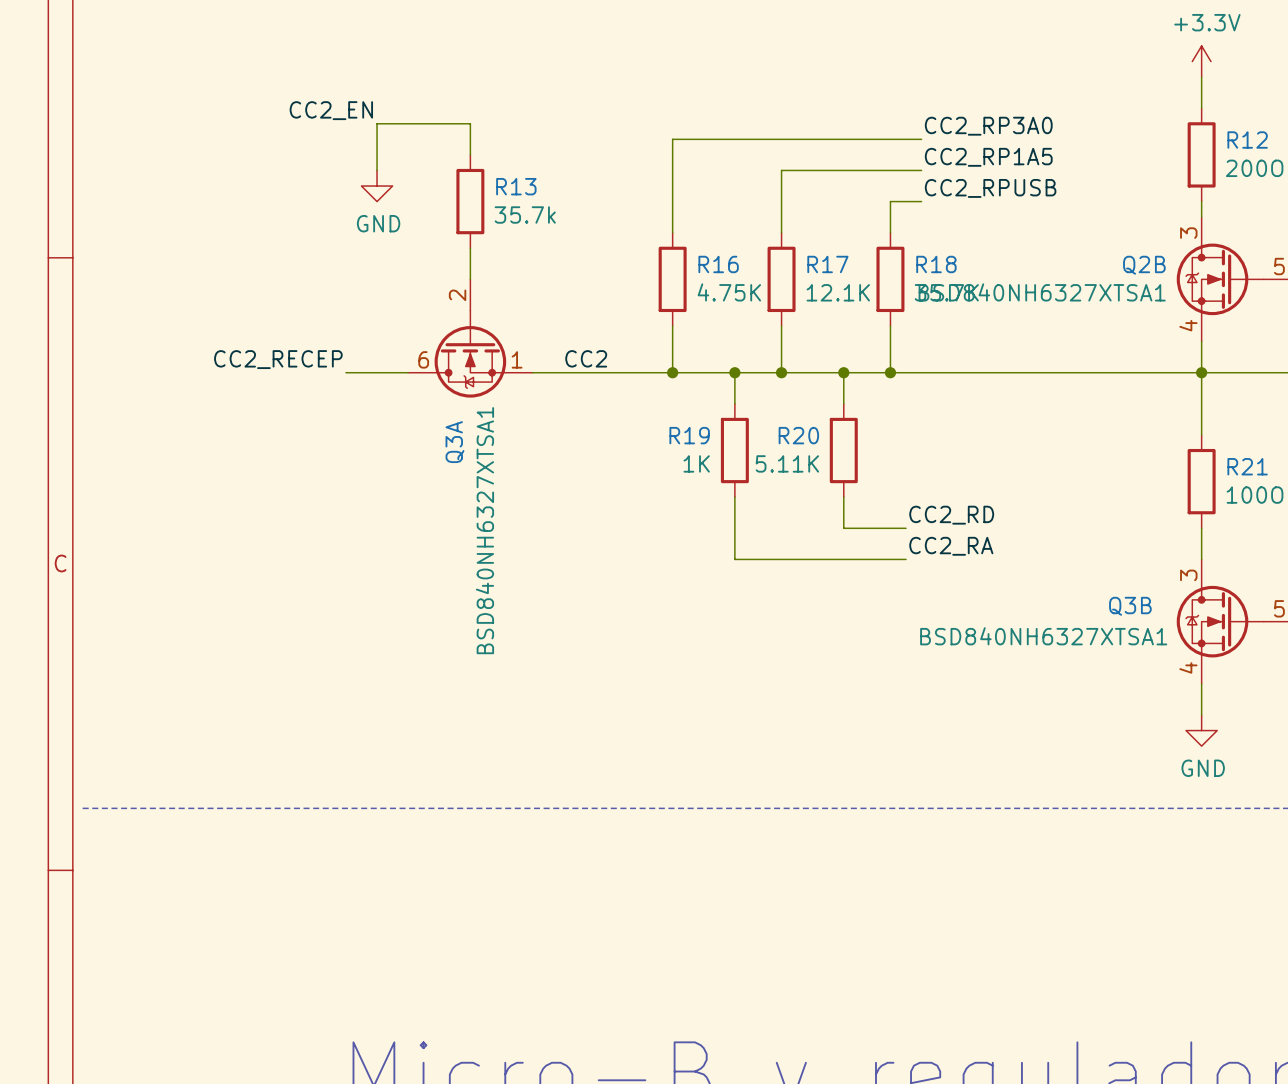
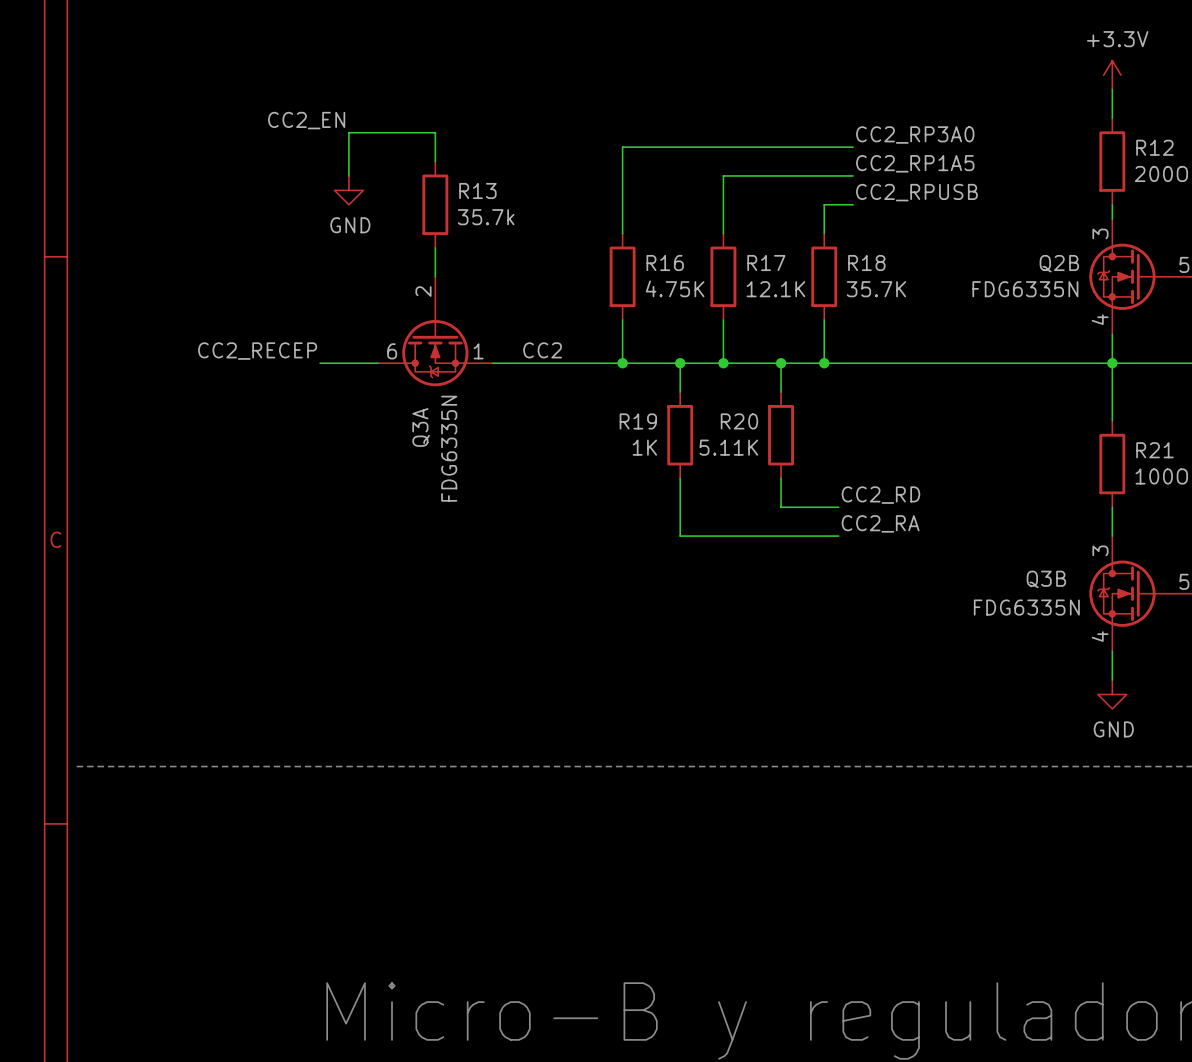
Q2B value: BSD840NH6327XTSA1 (1042, 292) -> FDG6335N (1025, 289)
Q3A value: BSD840NH6327XTSA1 (484, 530) -> FDG6335N (449, 448)
Q3B value: BSD840NH6327XTSA1 (1043, 636) -> FDG6335N (1026, 607)

